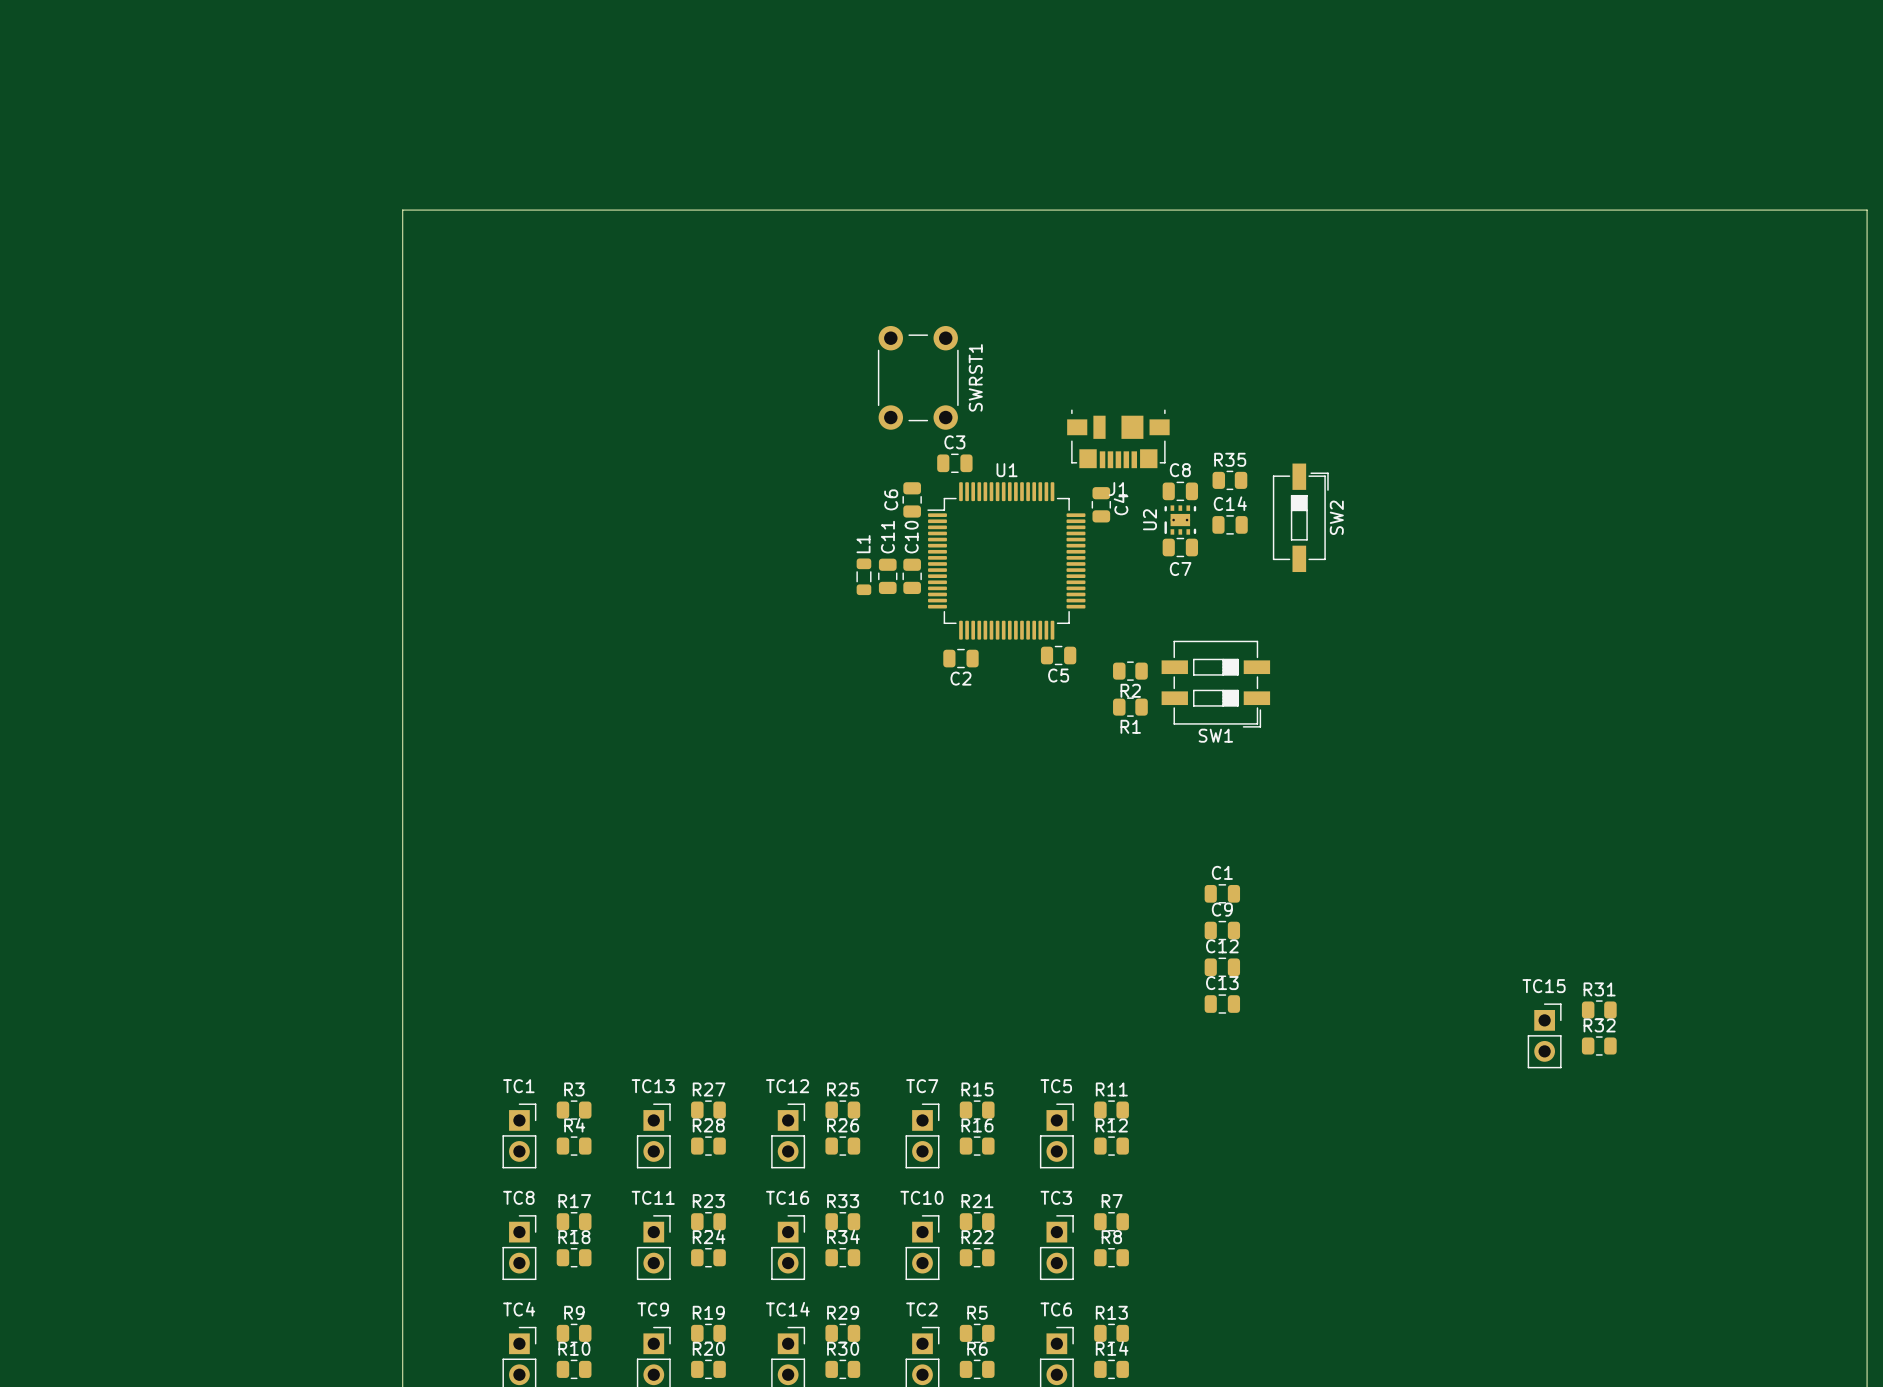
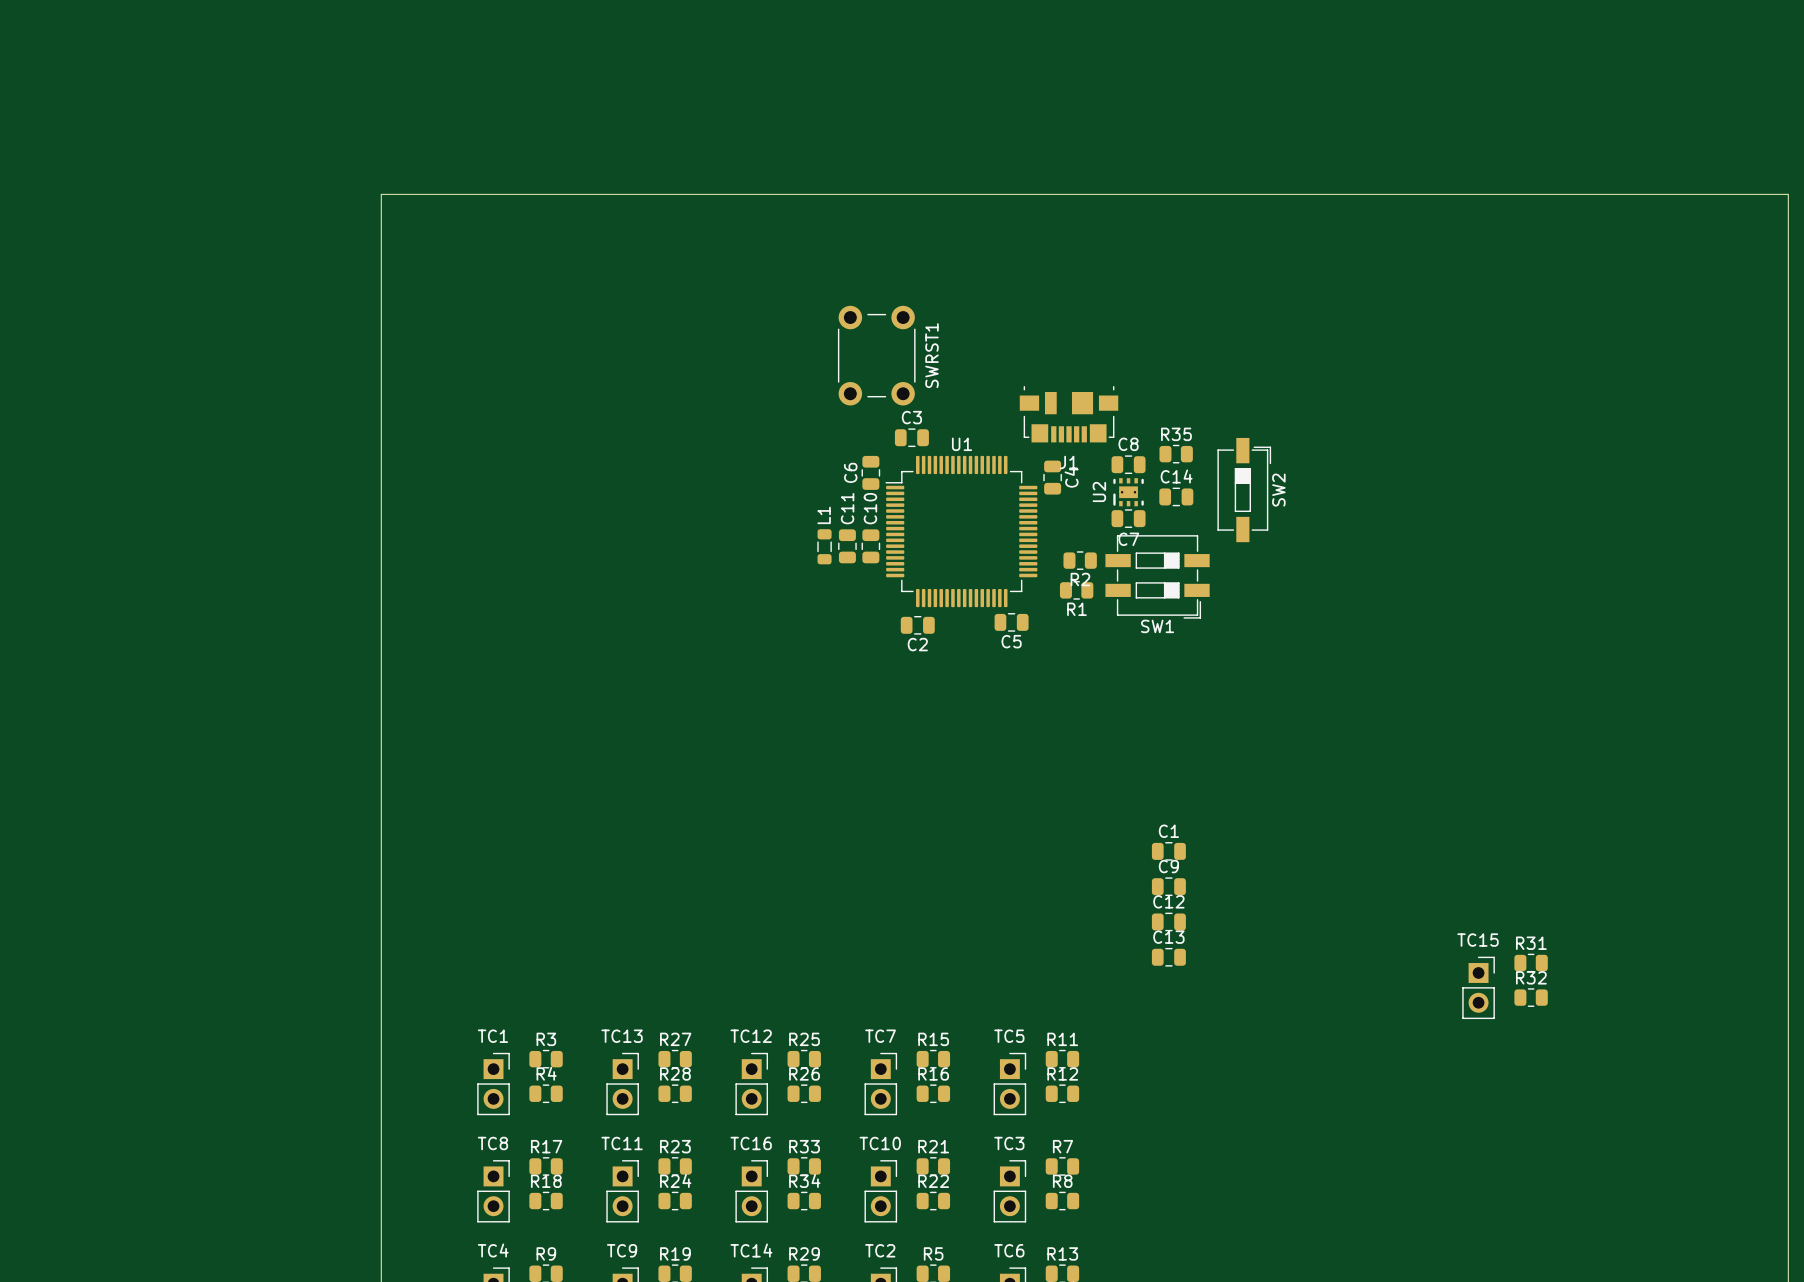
R2 position: (1130, 671) -> (1080, 560)
SW1 position: (1215, 684) -> (1157, 576)
R1 position: (1130, 707) -> (1076, 590)

